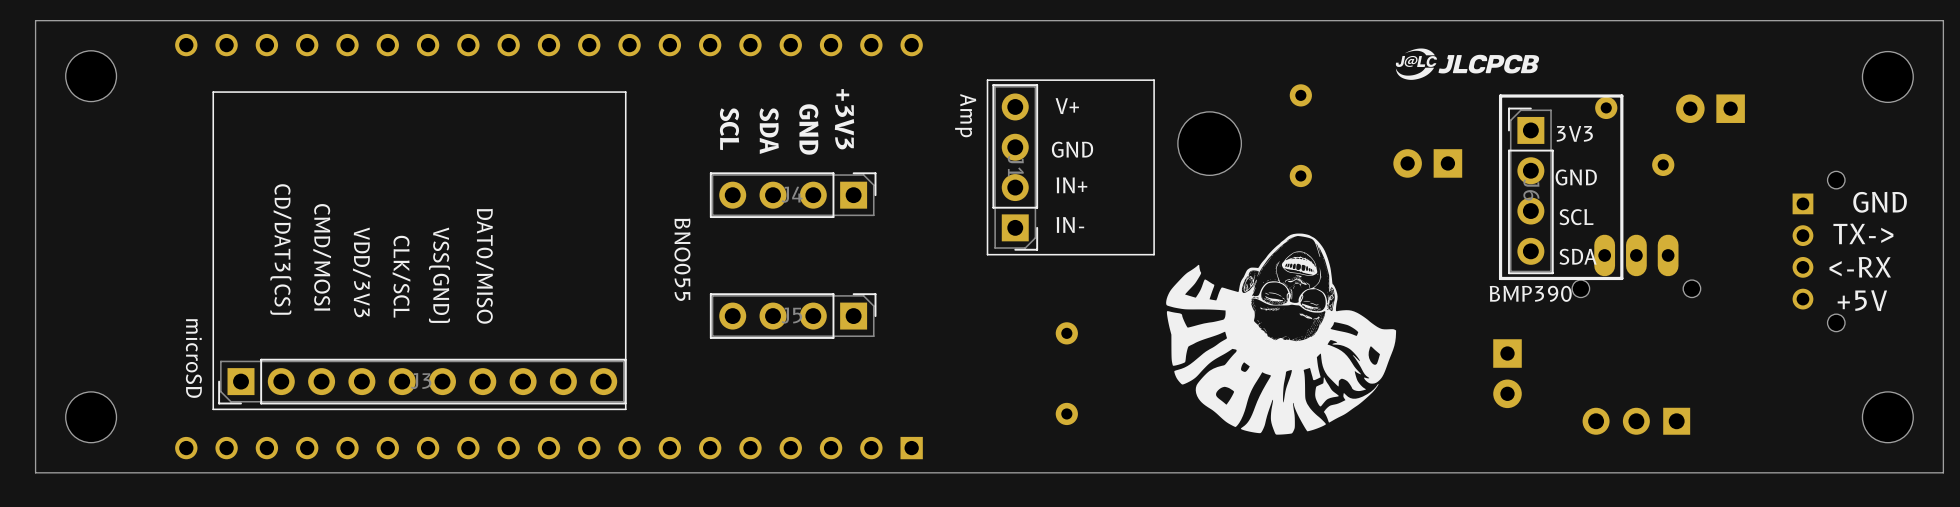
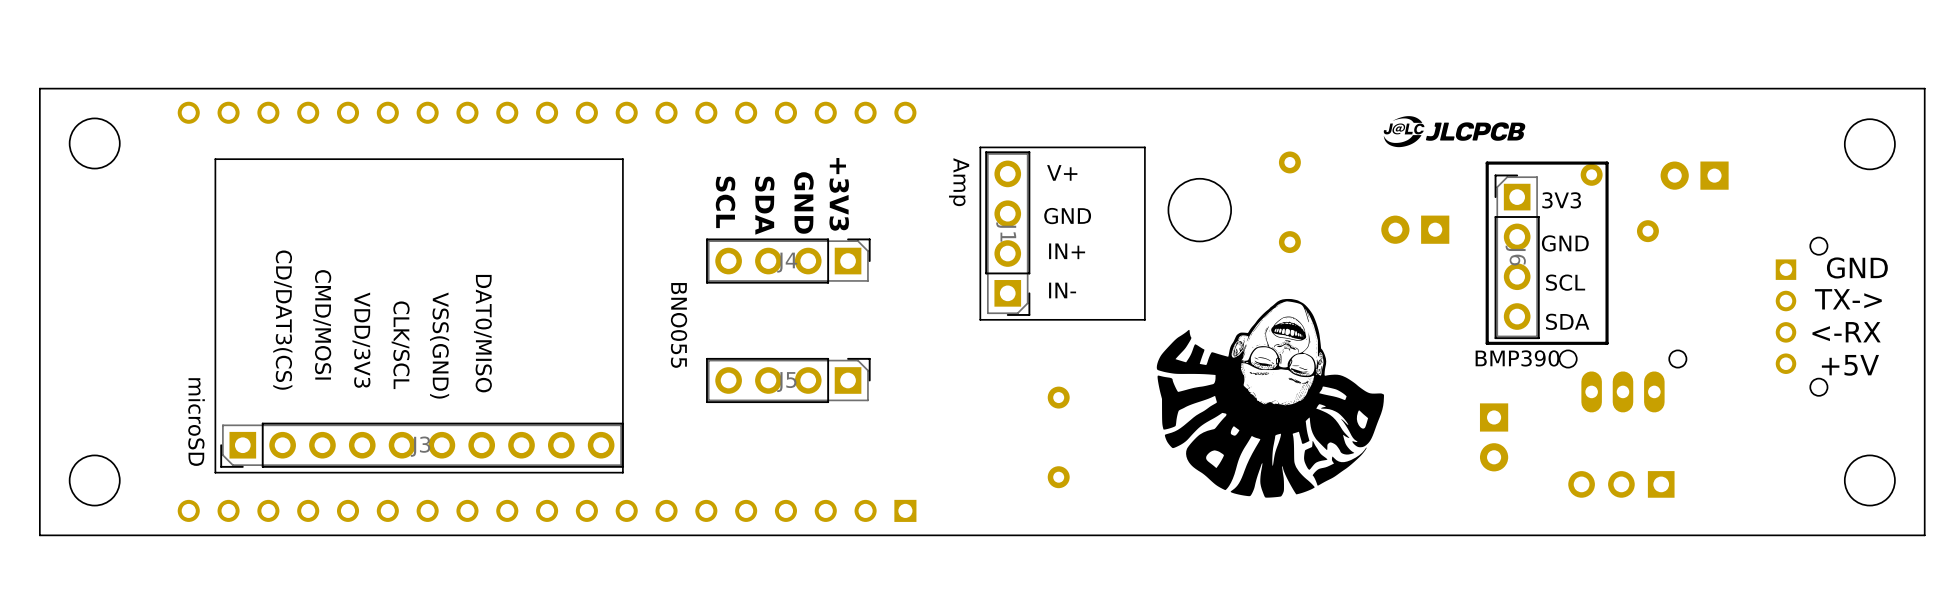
part rotation: 0° (1636, 266) -> 180° (1622, 381)

